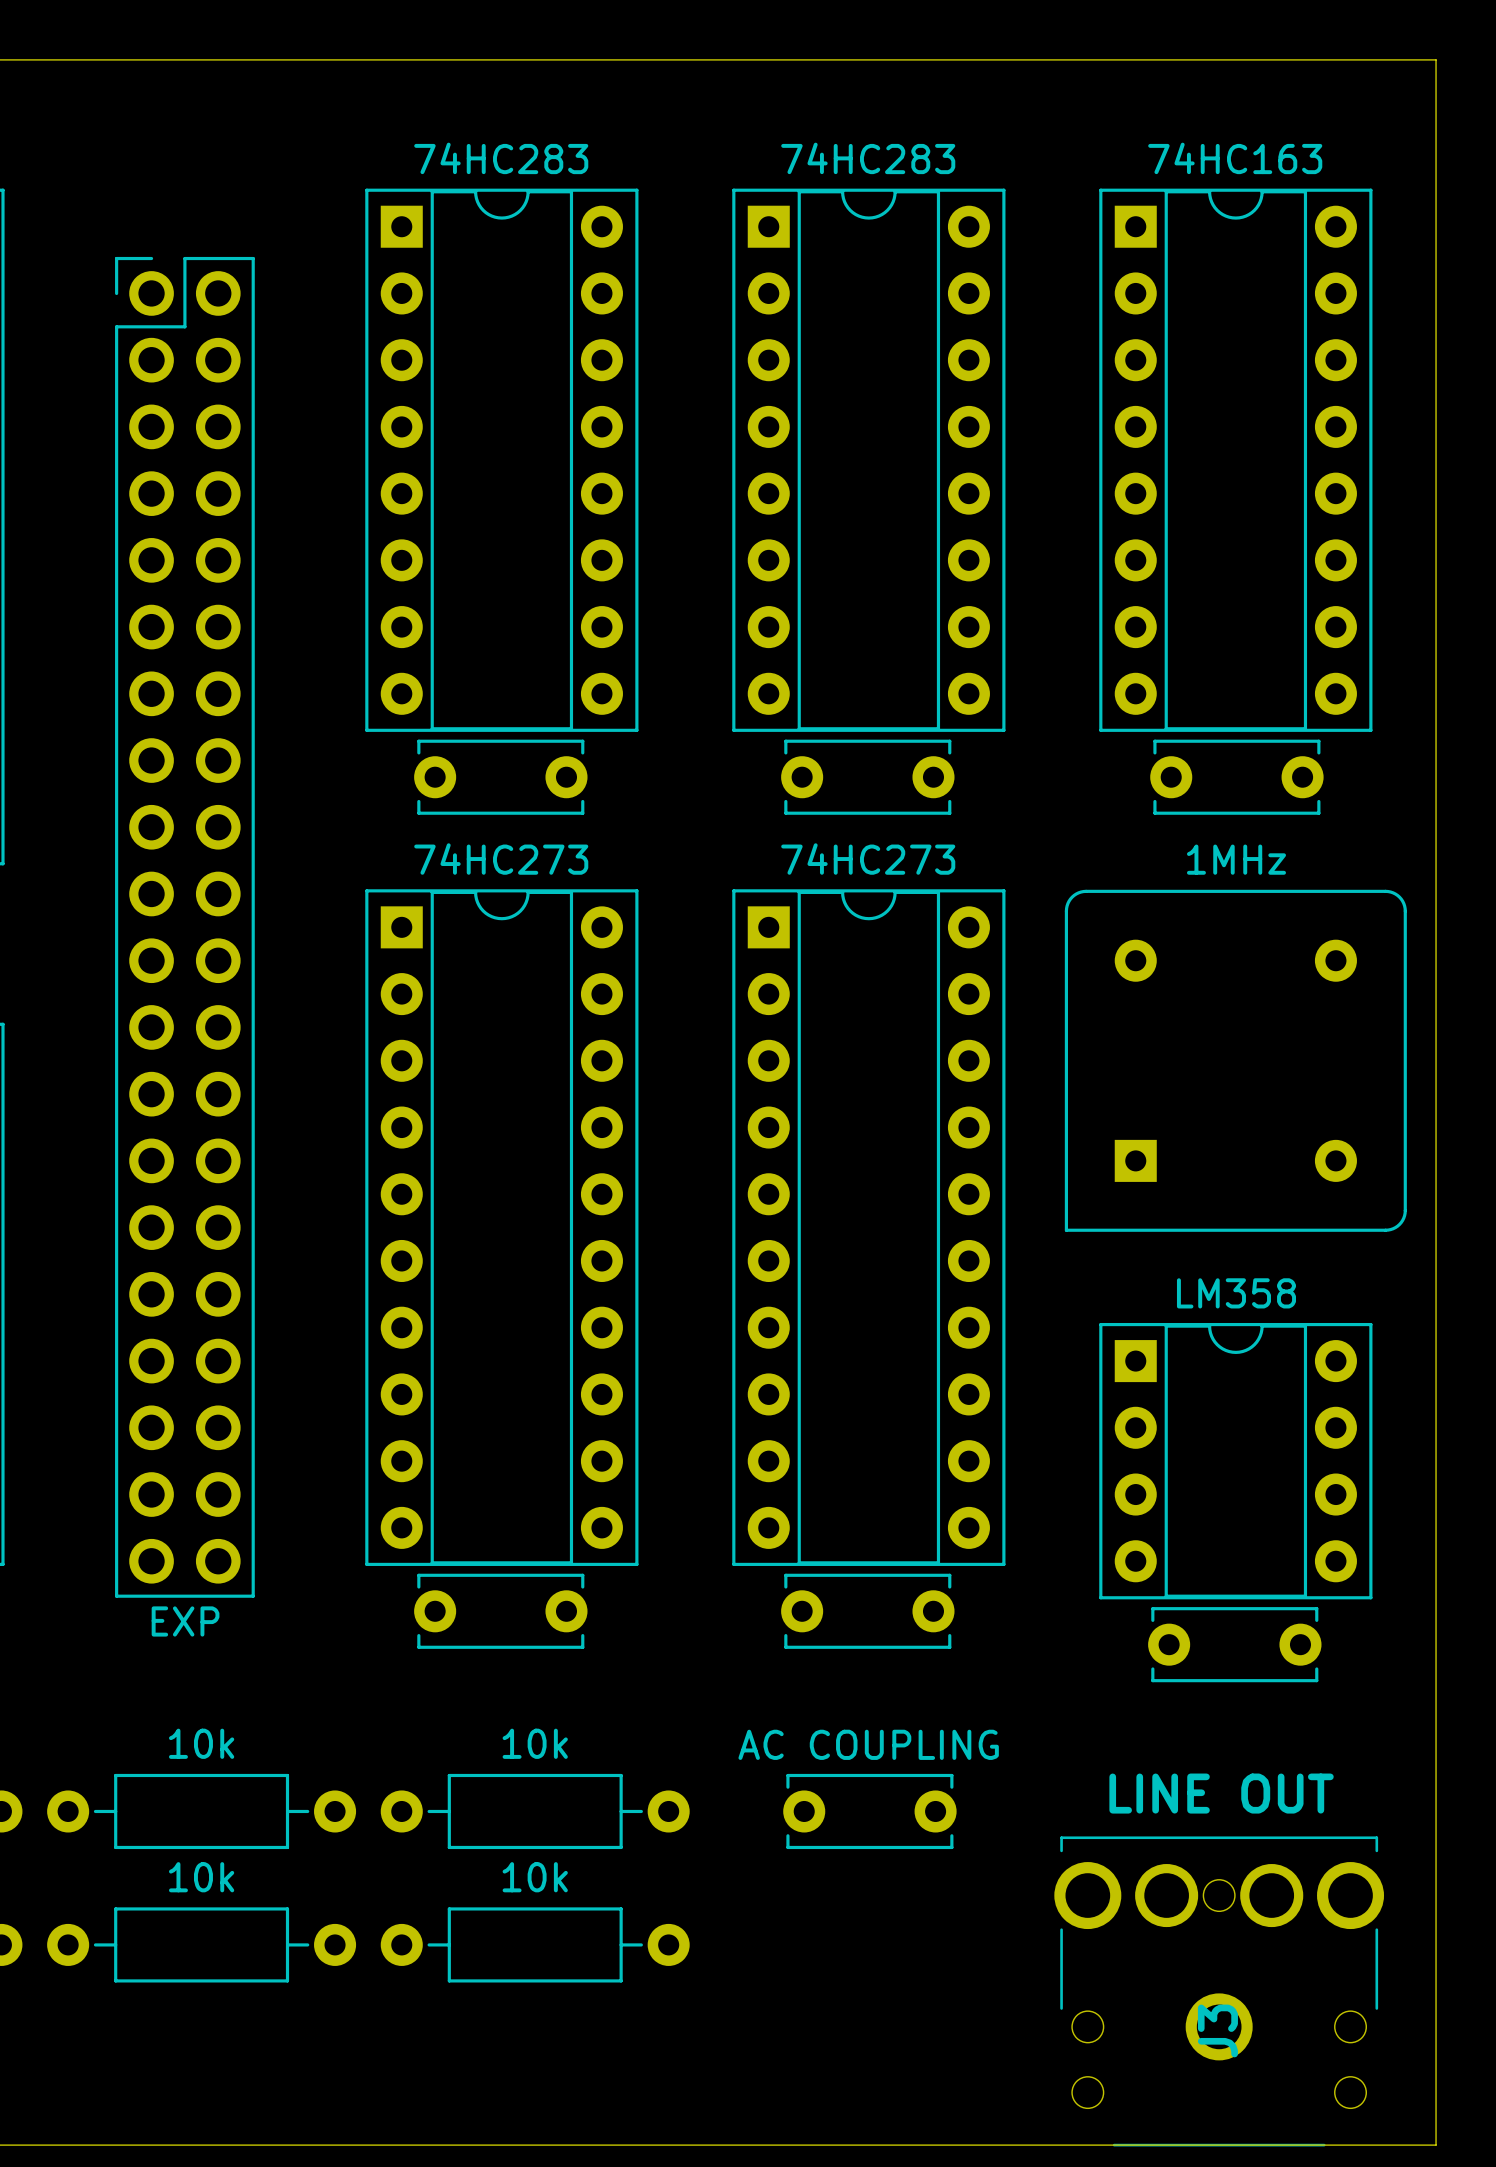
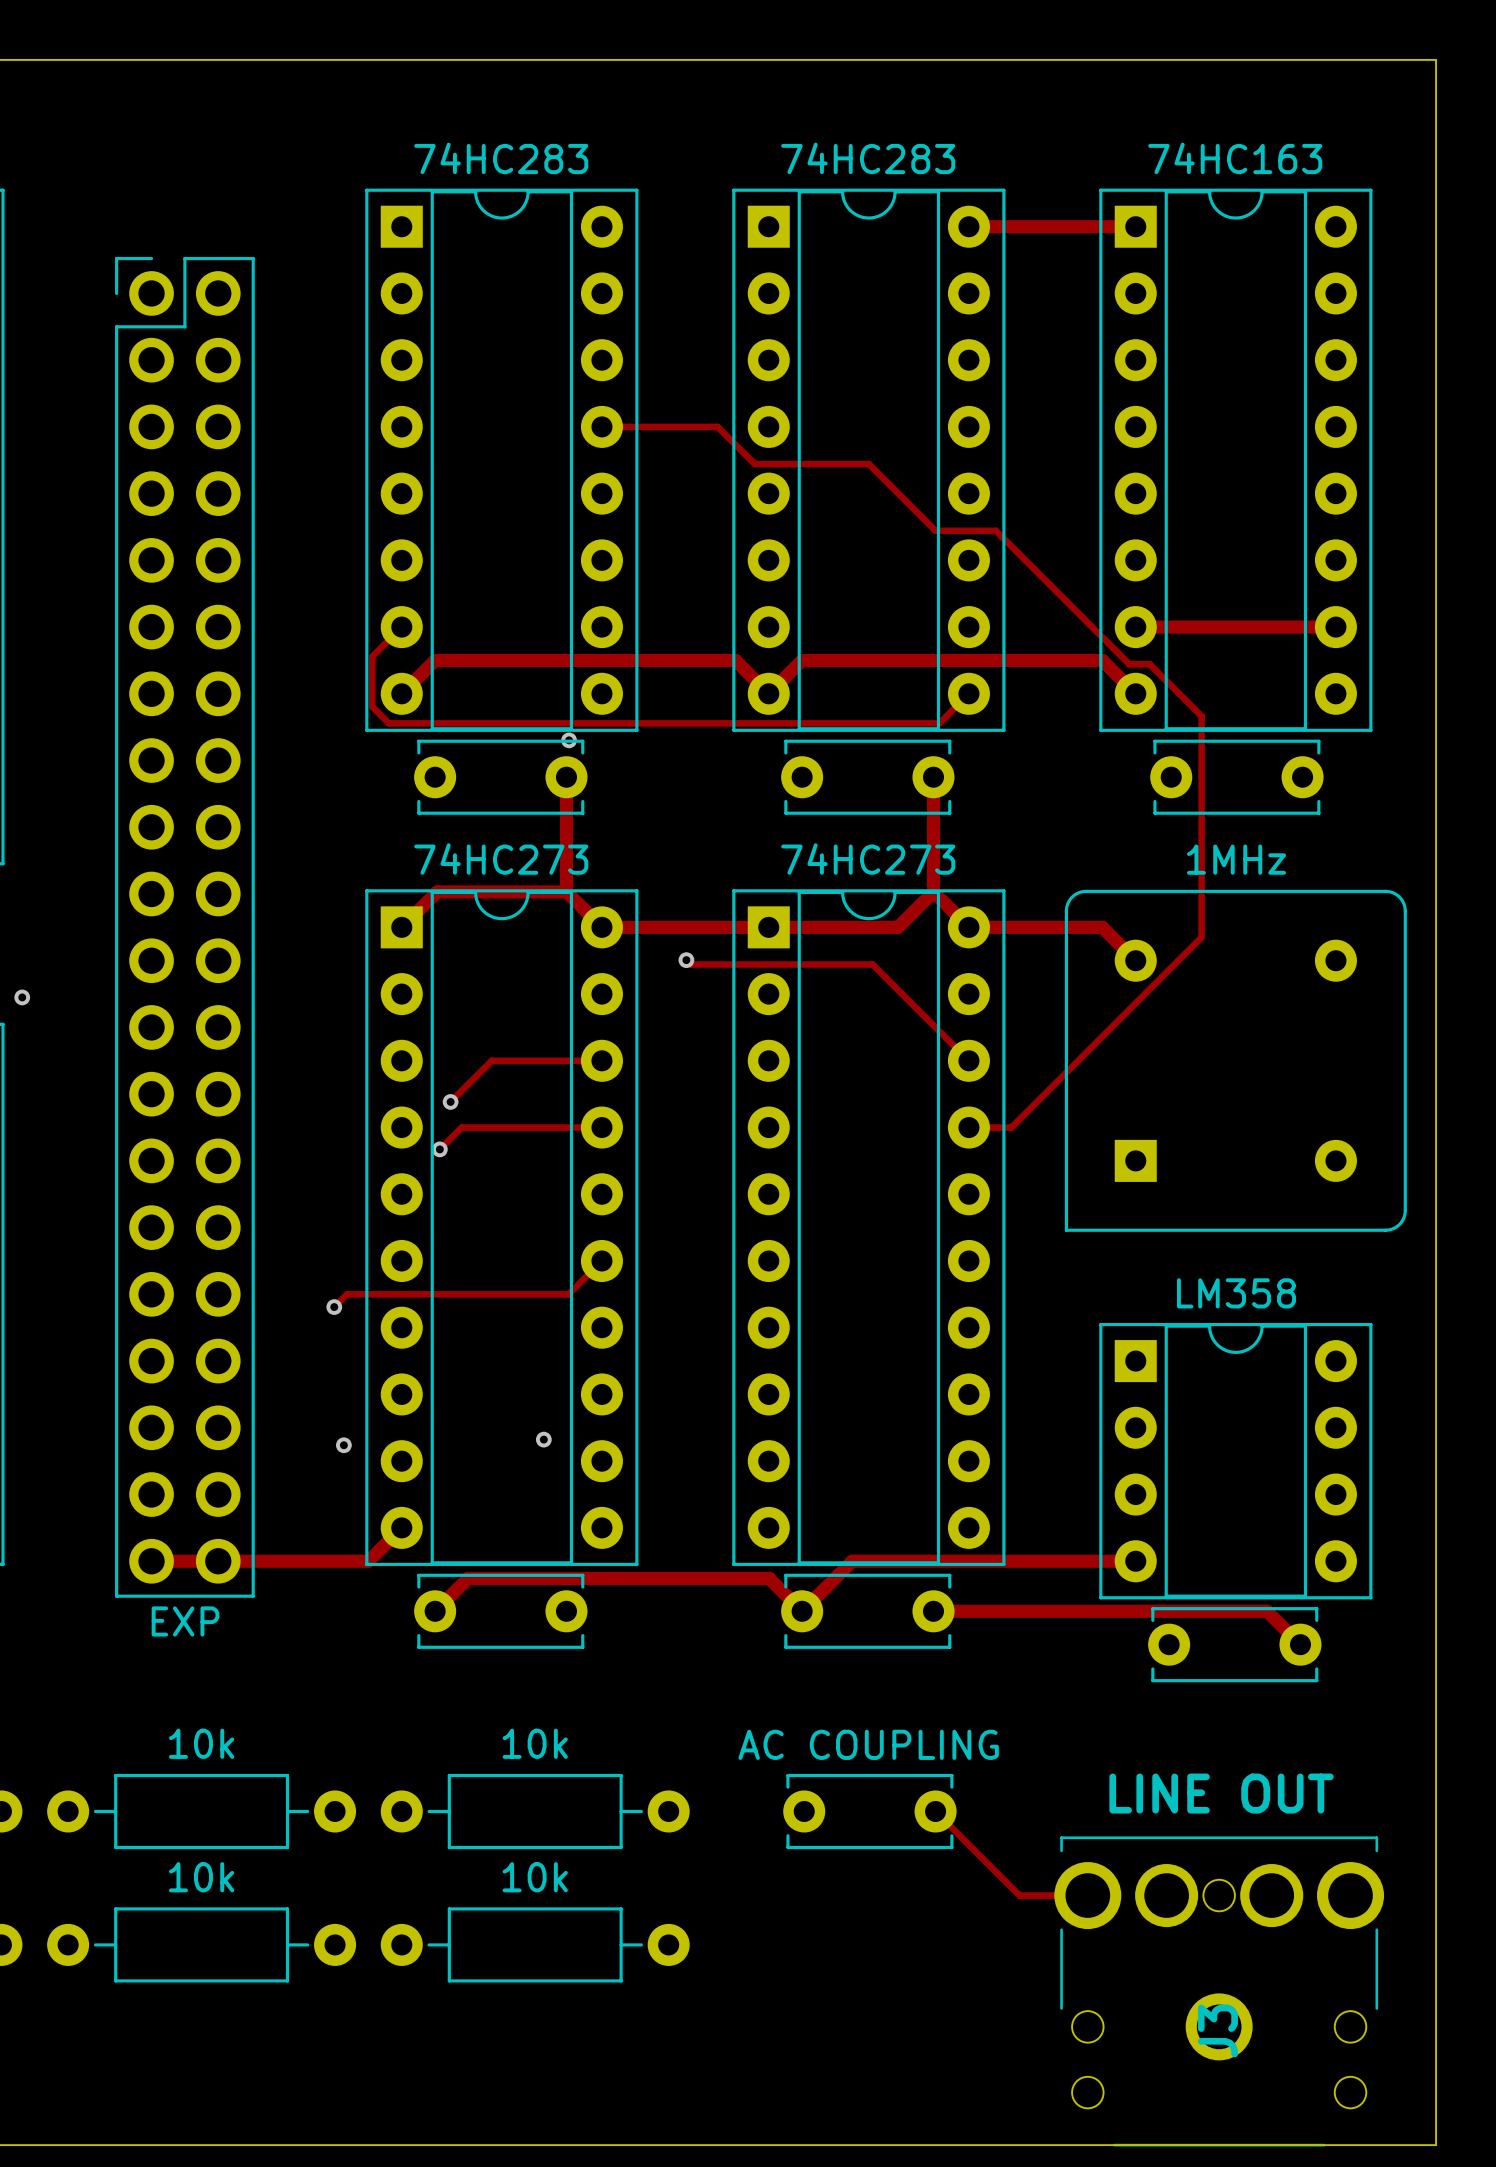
track: none -> (968, 226) (1135, 226)
track: none -> (601, 426) (717, 426) (754, 464) (868, 464) (935, 530) (995, 530) (1129, 664) (1149, 664) (1201, 716) (1201, 937) (1011, 1127) (968, 1127)
track: none -> (401, 627) (372, 656) (372, 706) (388, 723) (939, 723) (968, 693)
track: none -> (1135, 627) (1335, 627)
track: none -> (401, 693) (435, 660) (735, 660) (768, 693) (802, 660) (1102, 660) (1135, 693)
via: none -> (569, 740)
track: none -> (566, 777) (566, 891)
track: none -> (933, 777) (933, 891)
track: none -> (566, 891) (601, 927) (898, 927) (933, 891)
track: none -> (566, 891) (437, 891) (401, 927)
track: none -> (933, 891) (968, 927) (1102, 927) (1135, 960)
track: none -> (686, 960) (690, 964) (872, 964) (968, 1060)
via: none -> (686, 960)
via: none -> (22, 997)
track: none -> (601, 1060) (491, 1060) (450, 1101)
via: none -> (450, 1101)
track: none -> (601, 1127) (461, 1127) (439, 1149)
via: none -> (439, 1149)
track: none -> (601, 1260) (568, 1294) (346, 1294) (334, 1307)
via: none -> (334, 1307)
via: none -> (543, 1439)
via: none -> (343, 1445)
track: none -> (401, 1527) (368, 1561) (151, 1561)
track: none -> (1135, 1561) (852, 1561) (802, 1611) (769, 1578) (467, 1578) (435, 1611)
track: none -> (933, 1611) (1267, 1611) (1300, 1644)
track: none -> (935, 1811) (1019, 1895) (1087, 1895)

